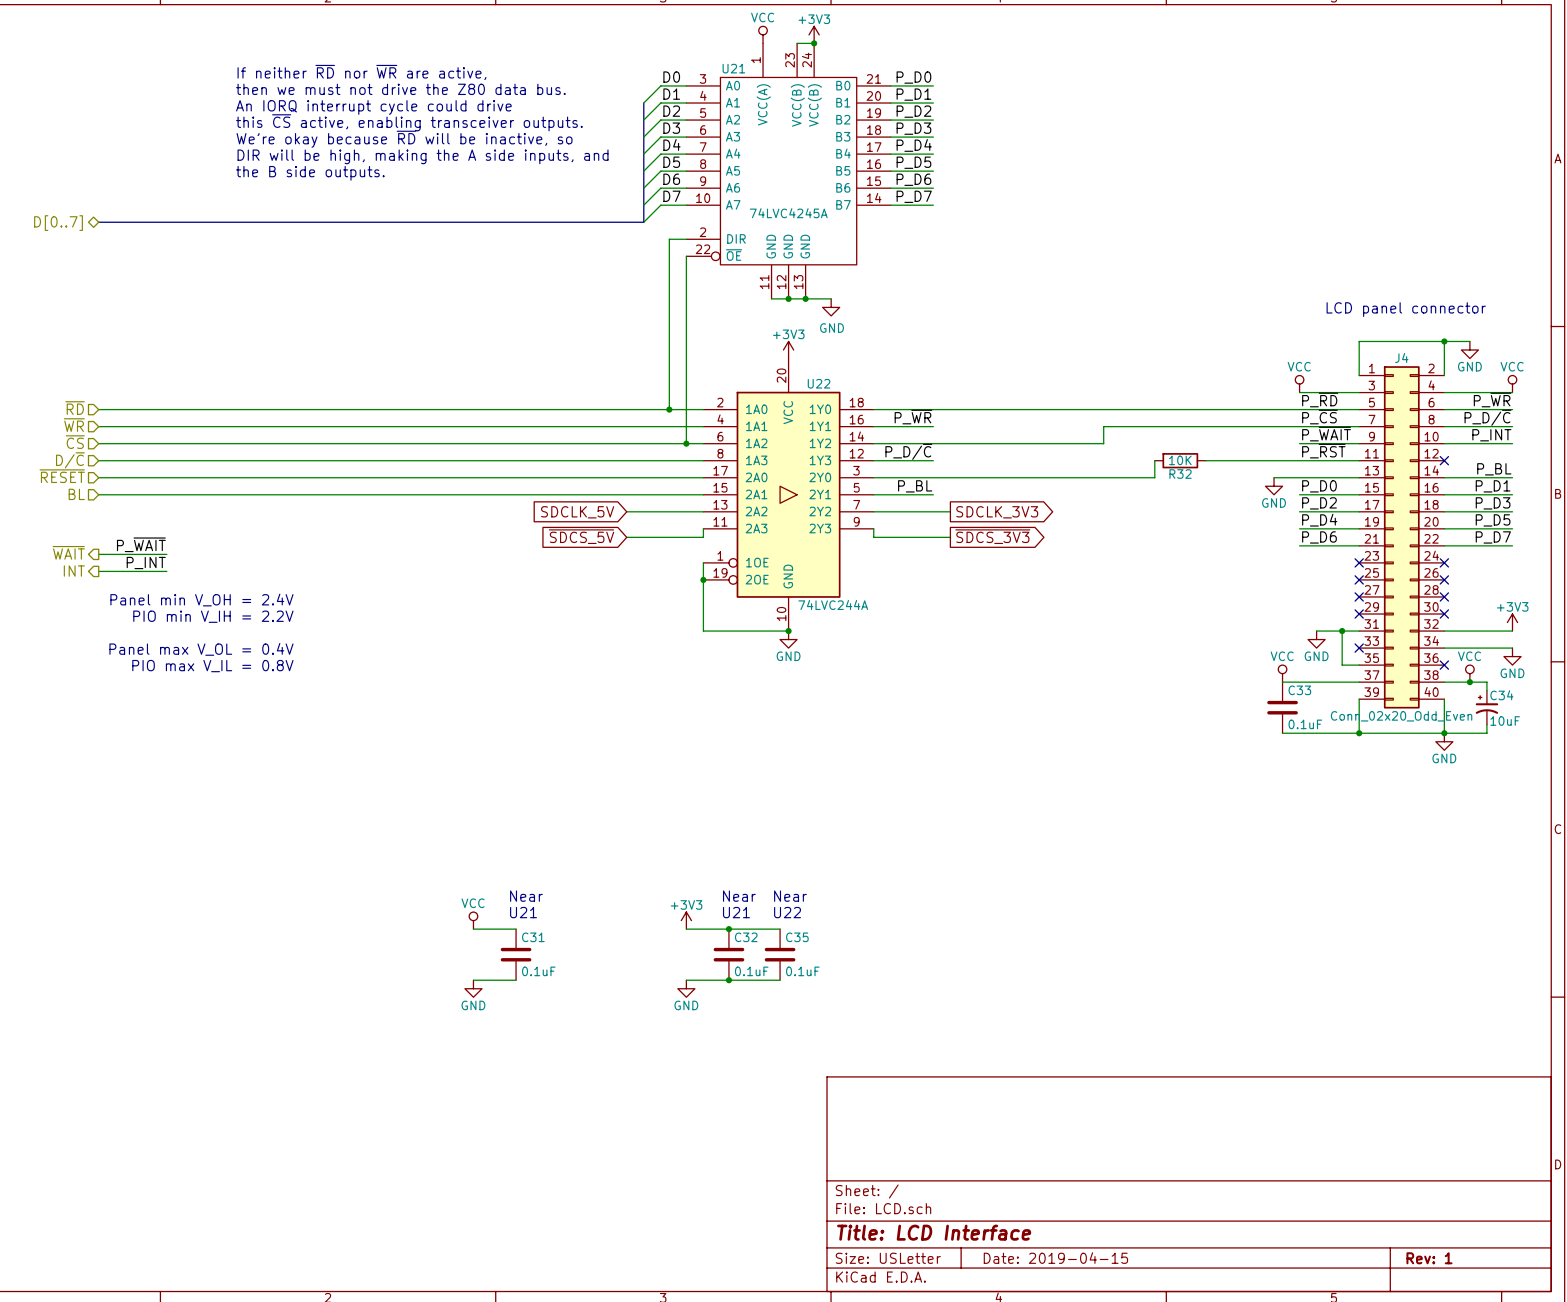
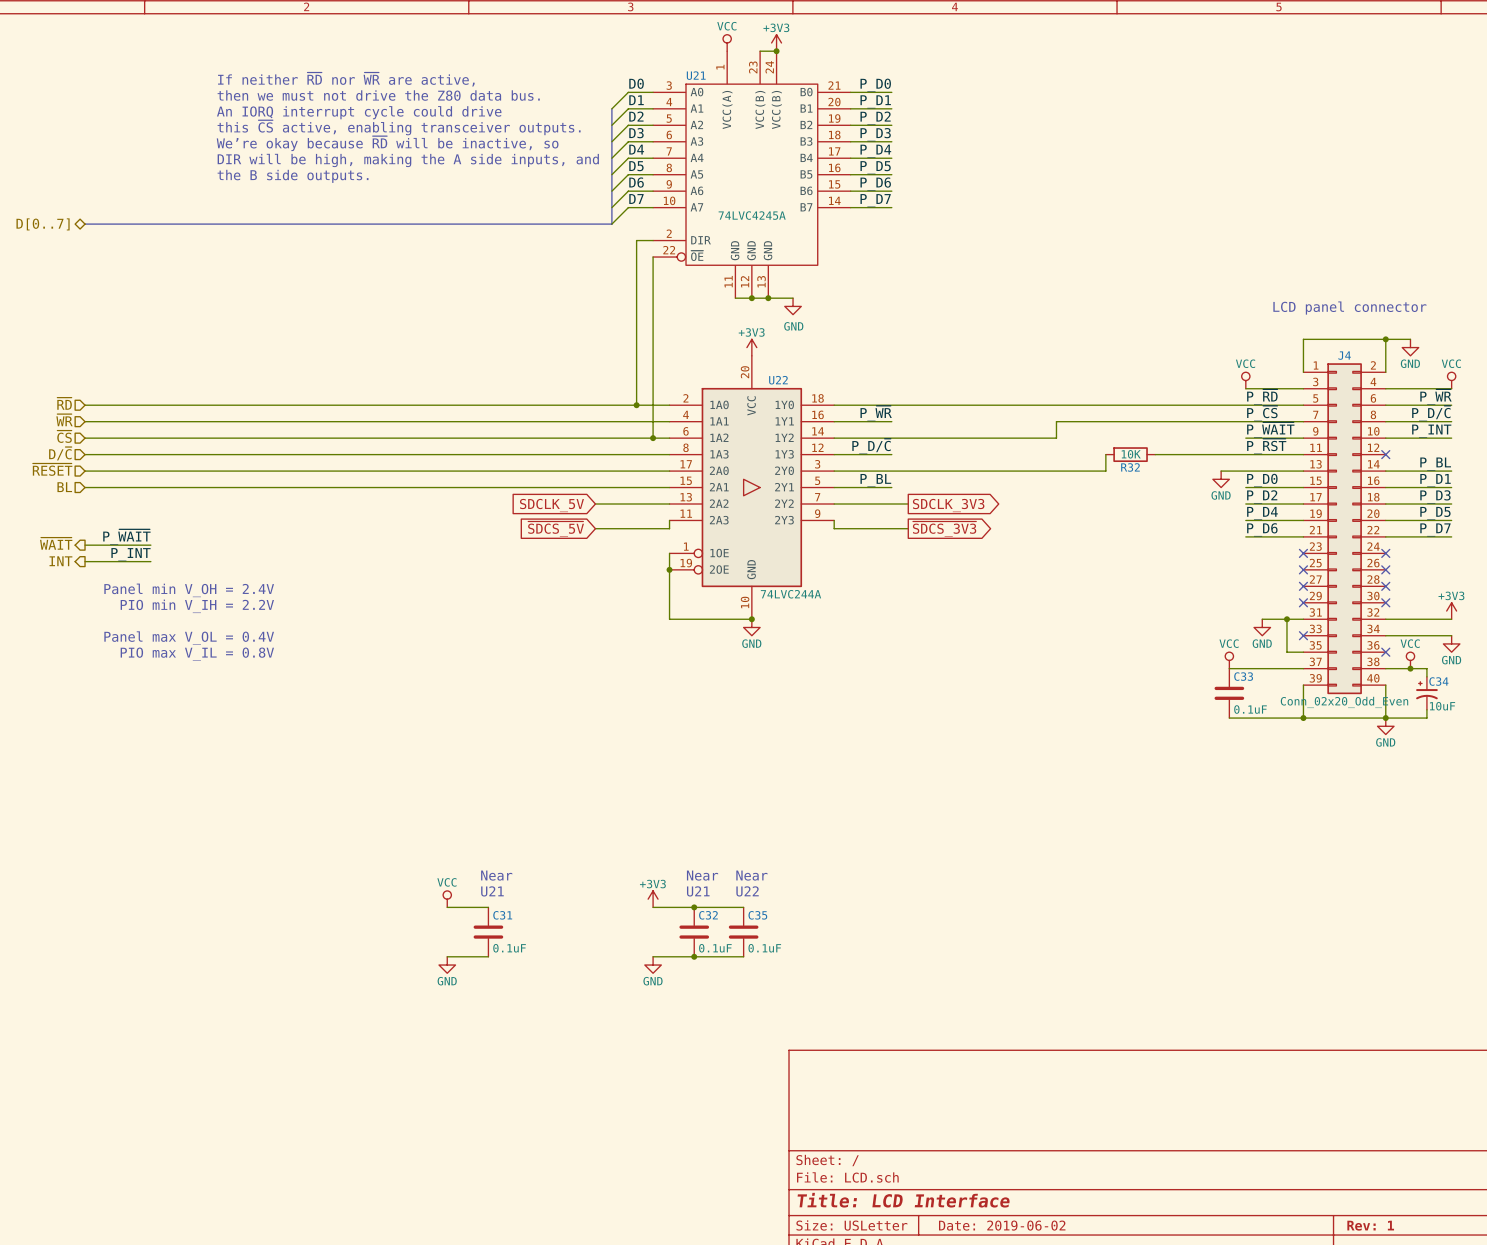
title block: Date: 2019-04-15 (1055, 1258) -> Date: 2019-06-02 (1002, 1225)

